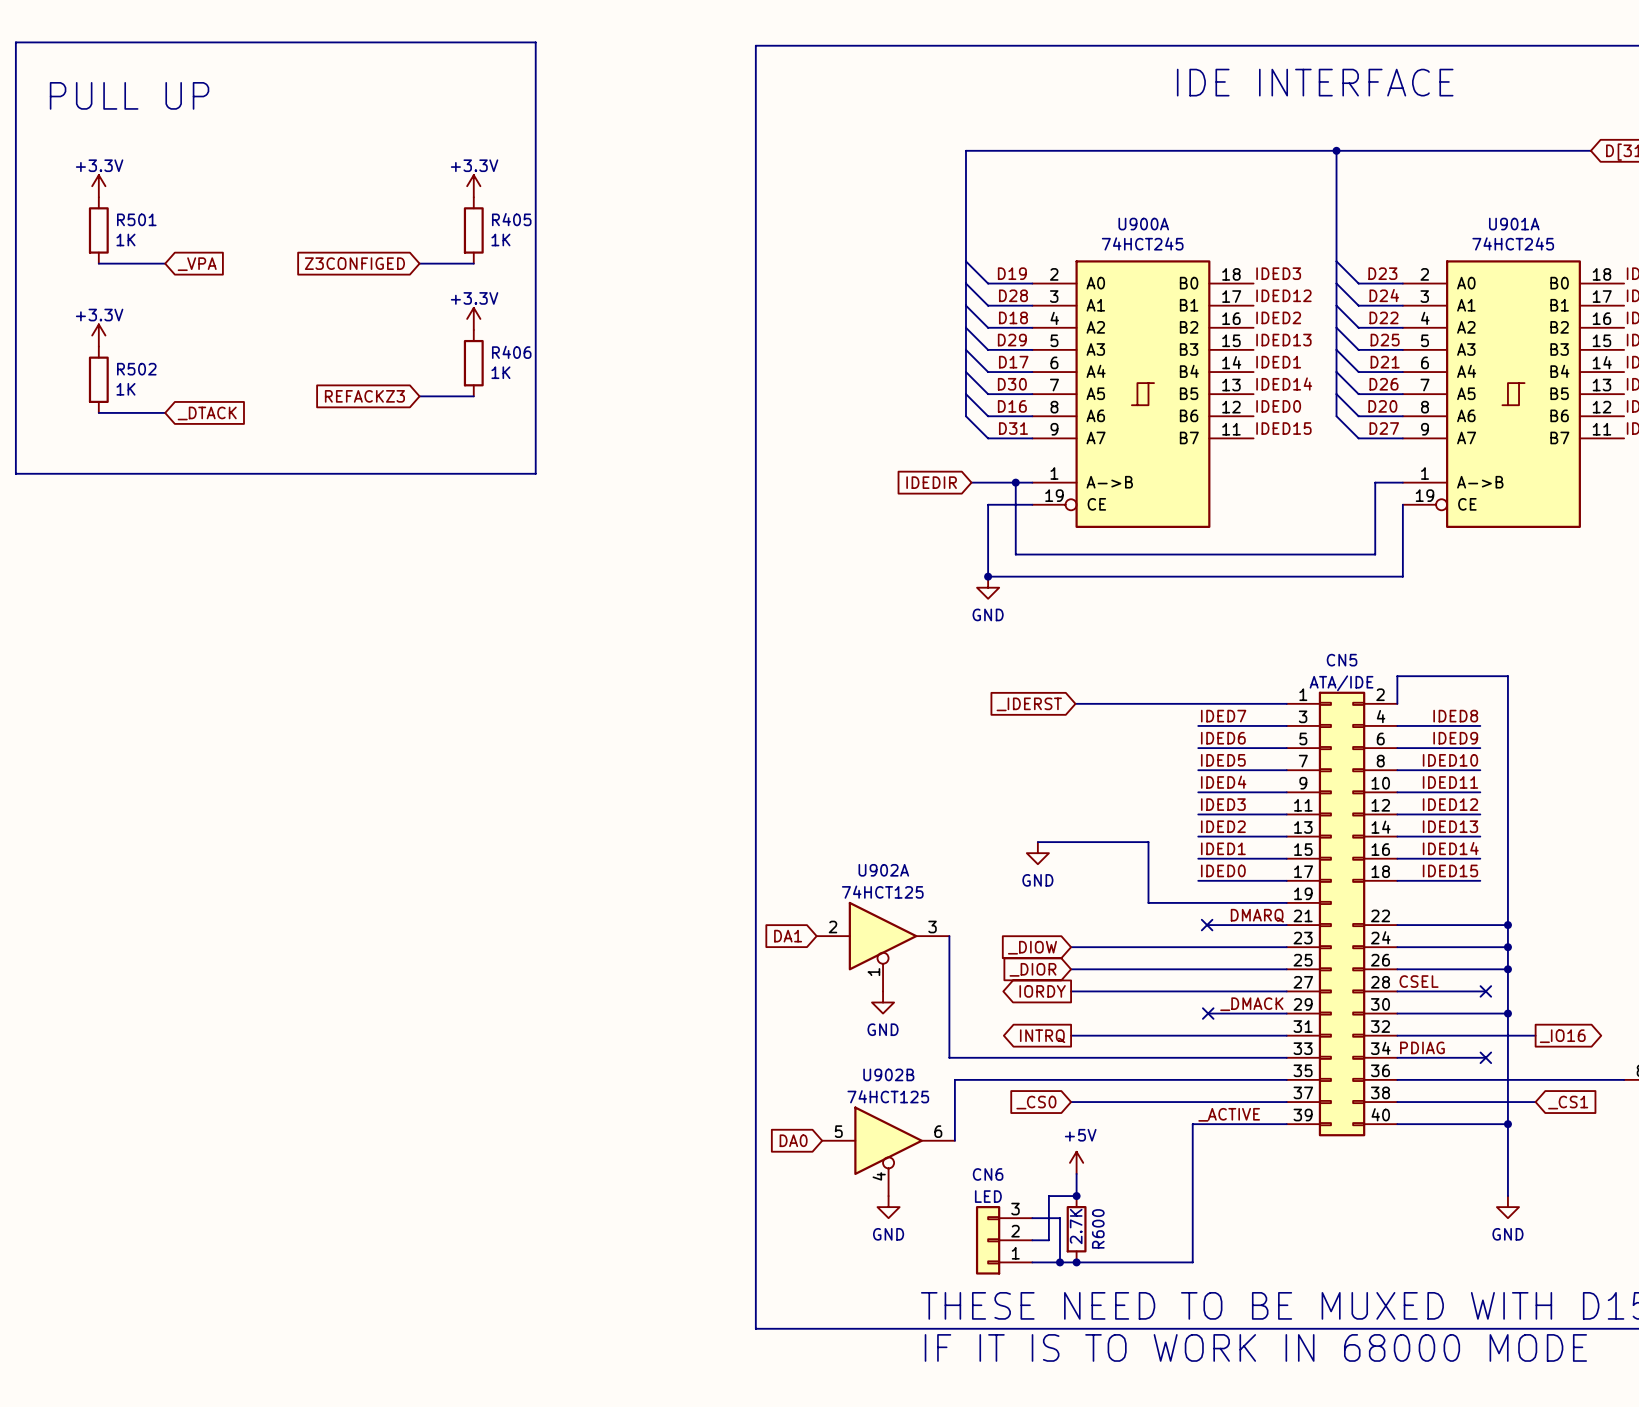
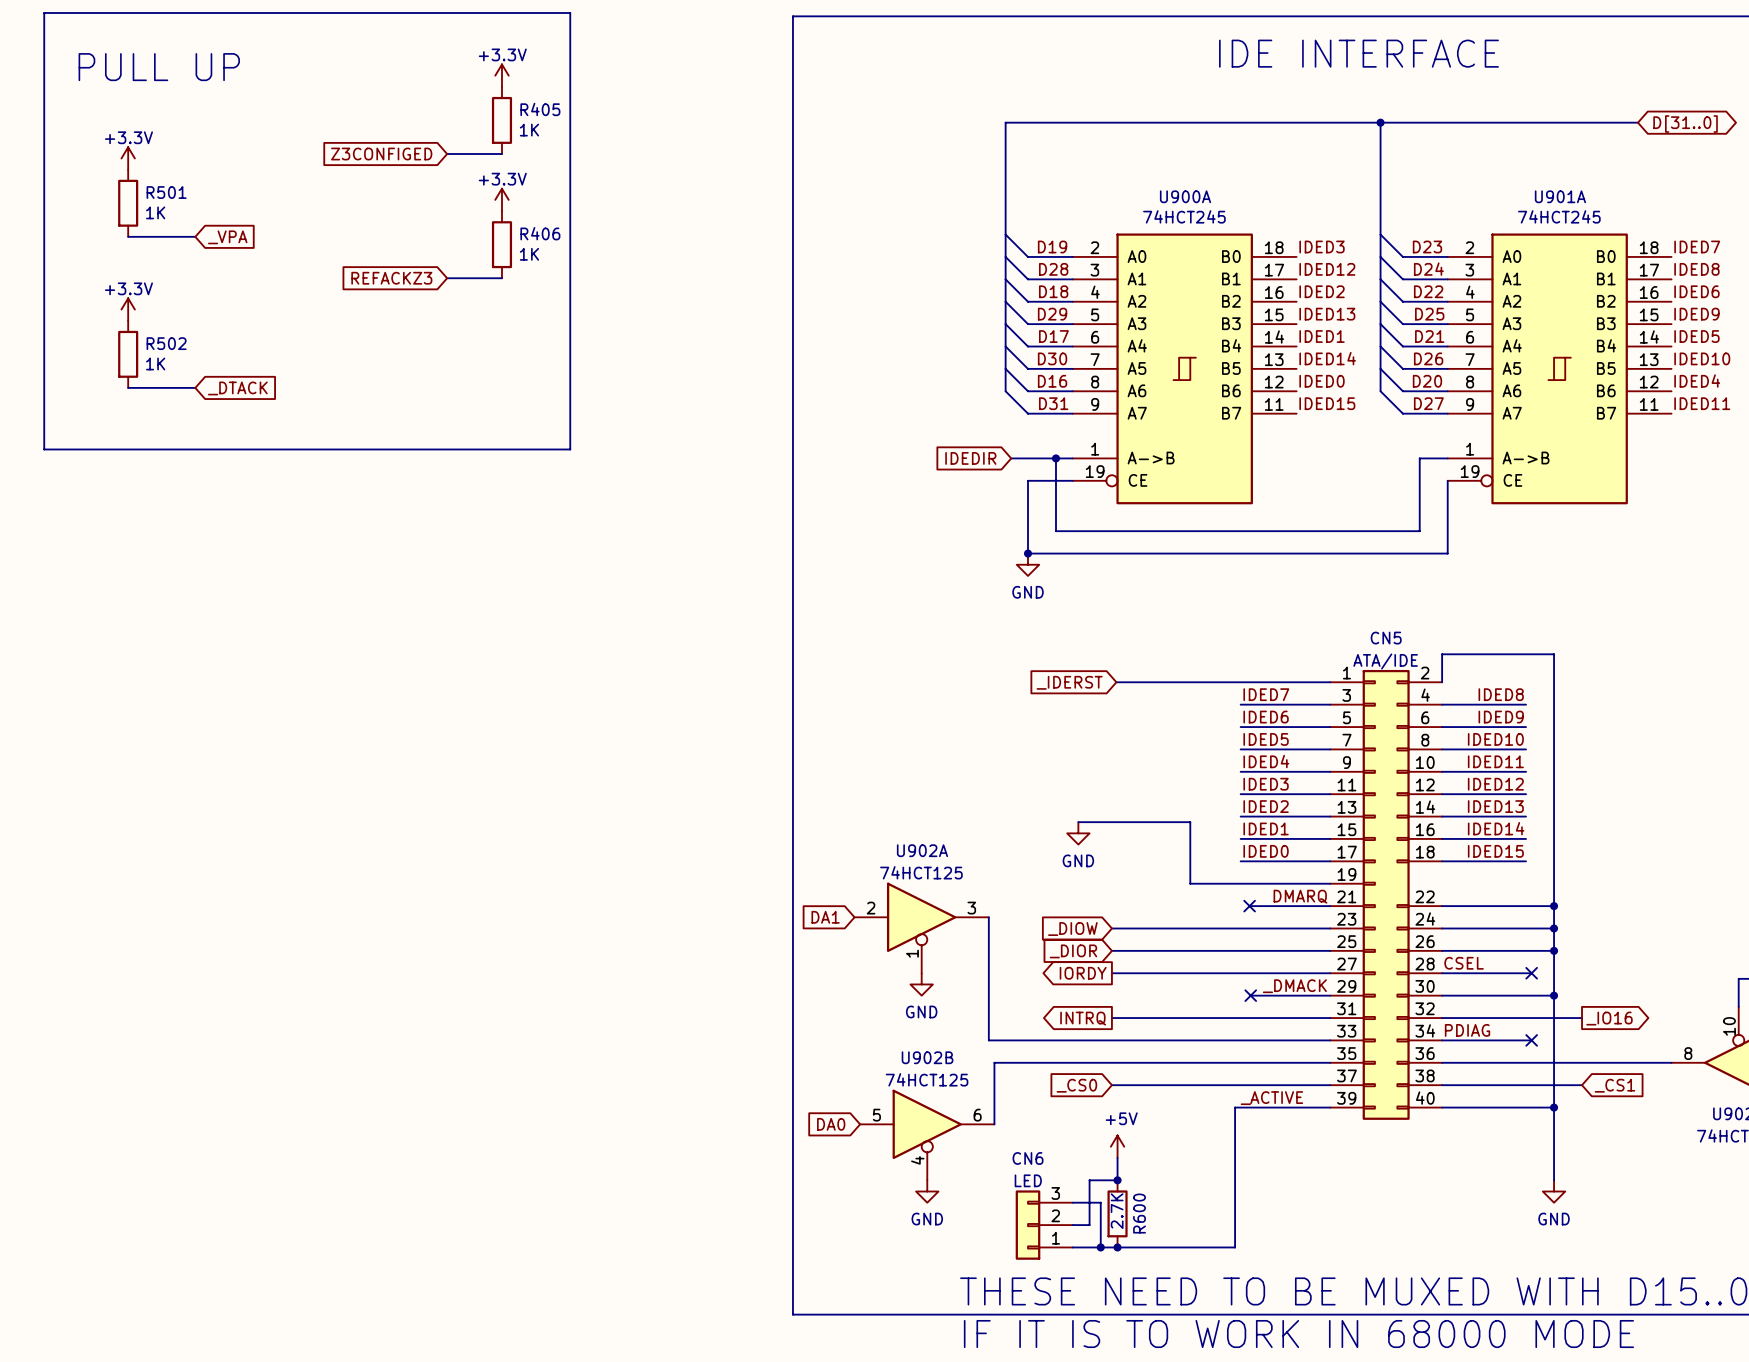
power symbol: none -> +3.3V (501, 75)
power symbol: +3.3V (473, 186) -> none
power symbol: none -> +3.3V (501, 199)
R405 position: (473, 230) -> (501, 120)
global label position: Z3CONFIGED (354, 263) -> Z3CONFIGED (381, 154)
wire: (419, 263) (473, 263) -> (447, 278) (501, 278)
power symbol: +3.3V (473, 318) -> none
R406 position: (473, 363) -> (501, 244)
global label position: REFACKZ3 (364, 396) -> REFACKZ3 (391, 278)
wire: (419, 396) (473, 396) -> (447, 154) (501, 154)

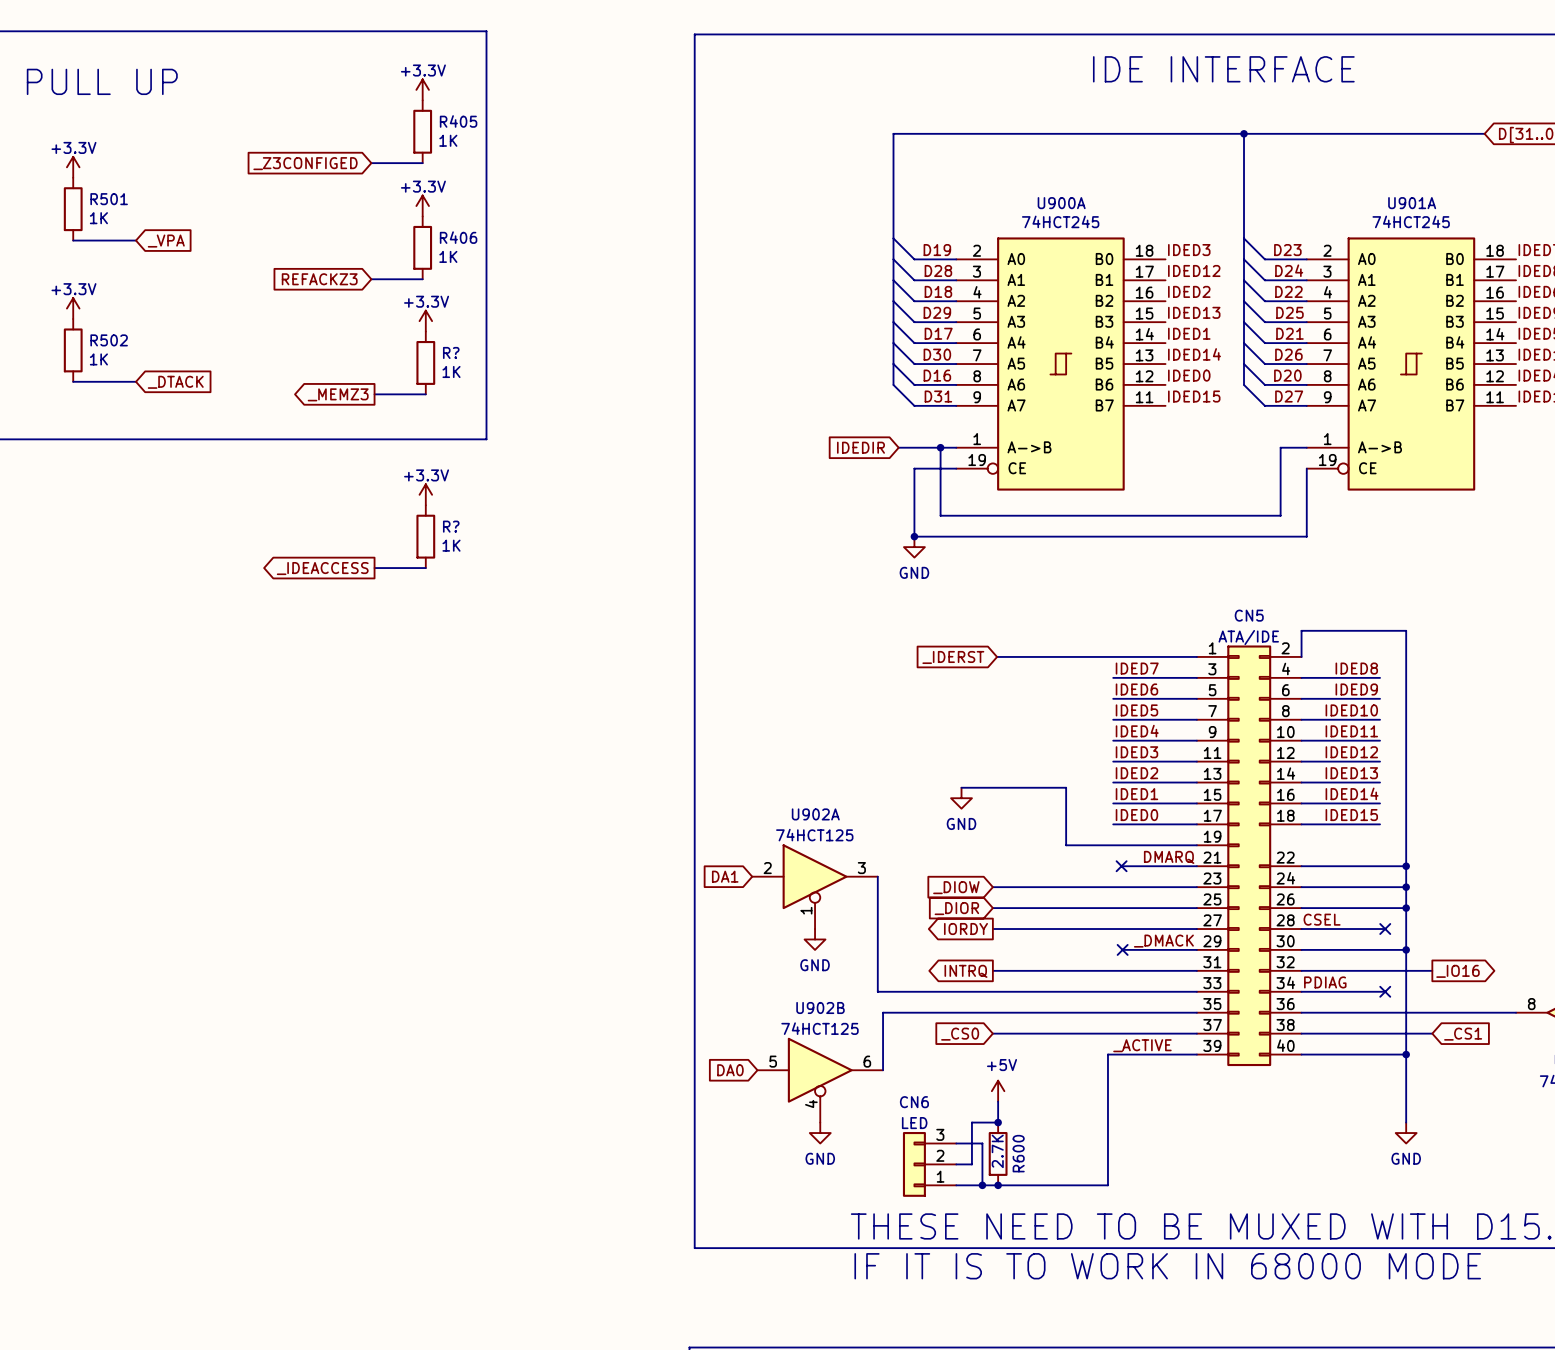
global label: Z3CONFIGED (381, 154) -> _Z3CONFIGED (305, 163)
power symbol: none -> +3.3V (425, 321)
R?: none -> 1K (425, 362)
global label: none -> _MEMZ3 (338, 394)
wire: none -> (374, 394) (425, 394)
power symbol: none -> +3.3V (425, 494)
R?: none -> 1K (425, 536)
global label: none -> _IDEACCESS (322, 568)
wire: none -> (374, 568) (425, 568)

